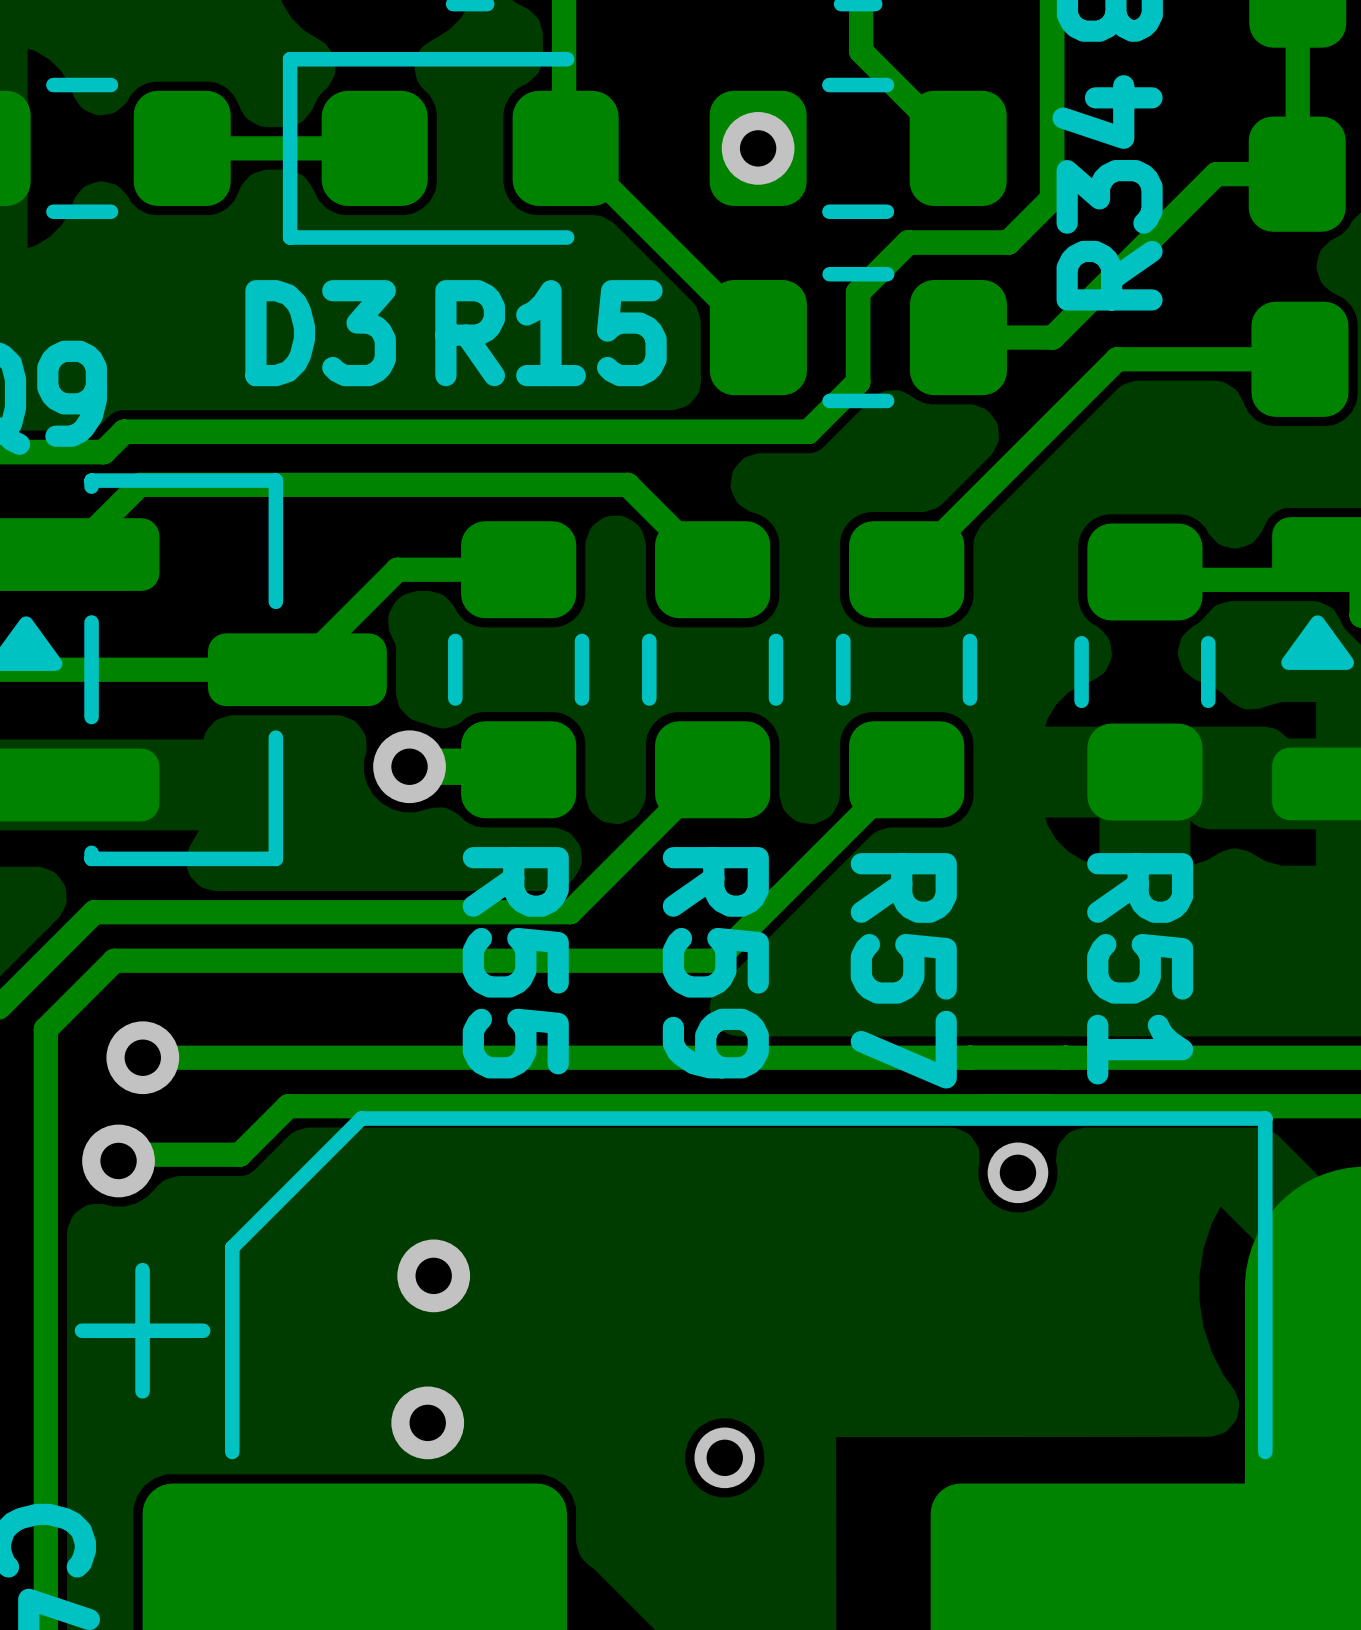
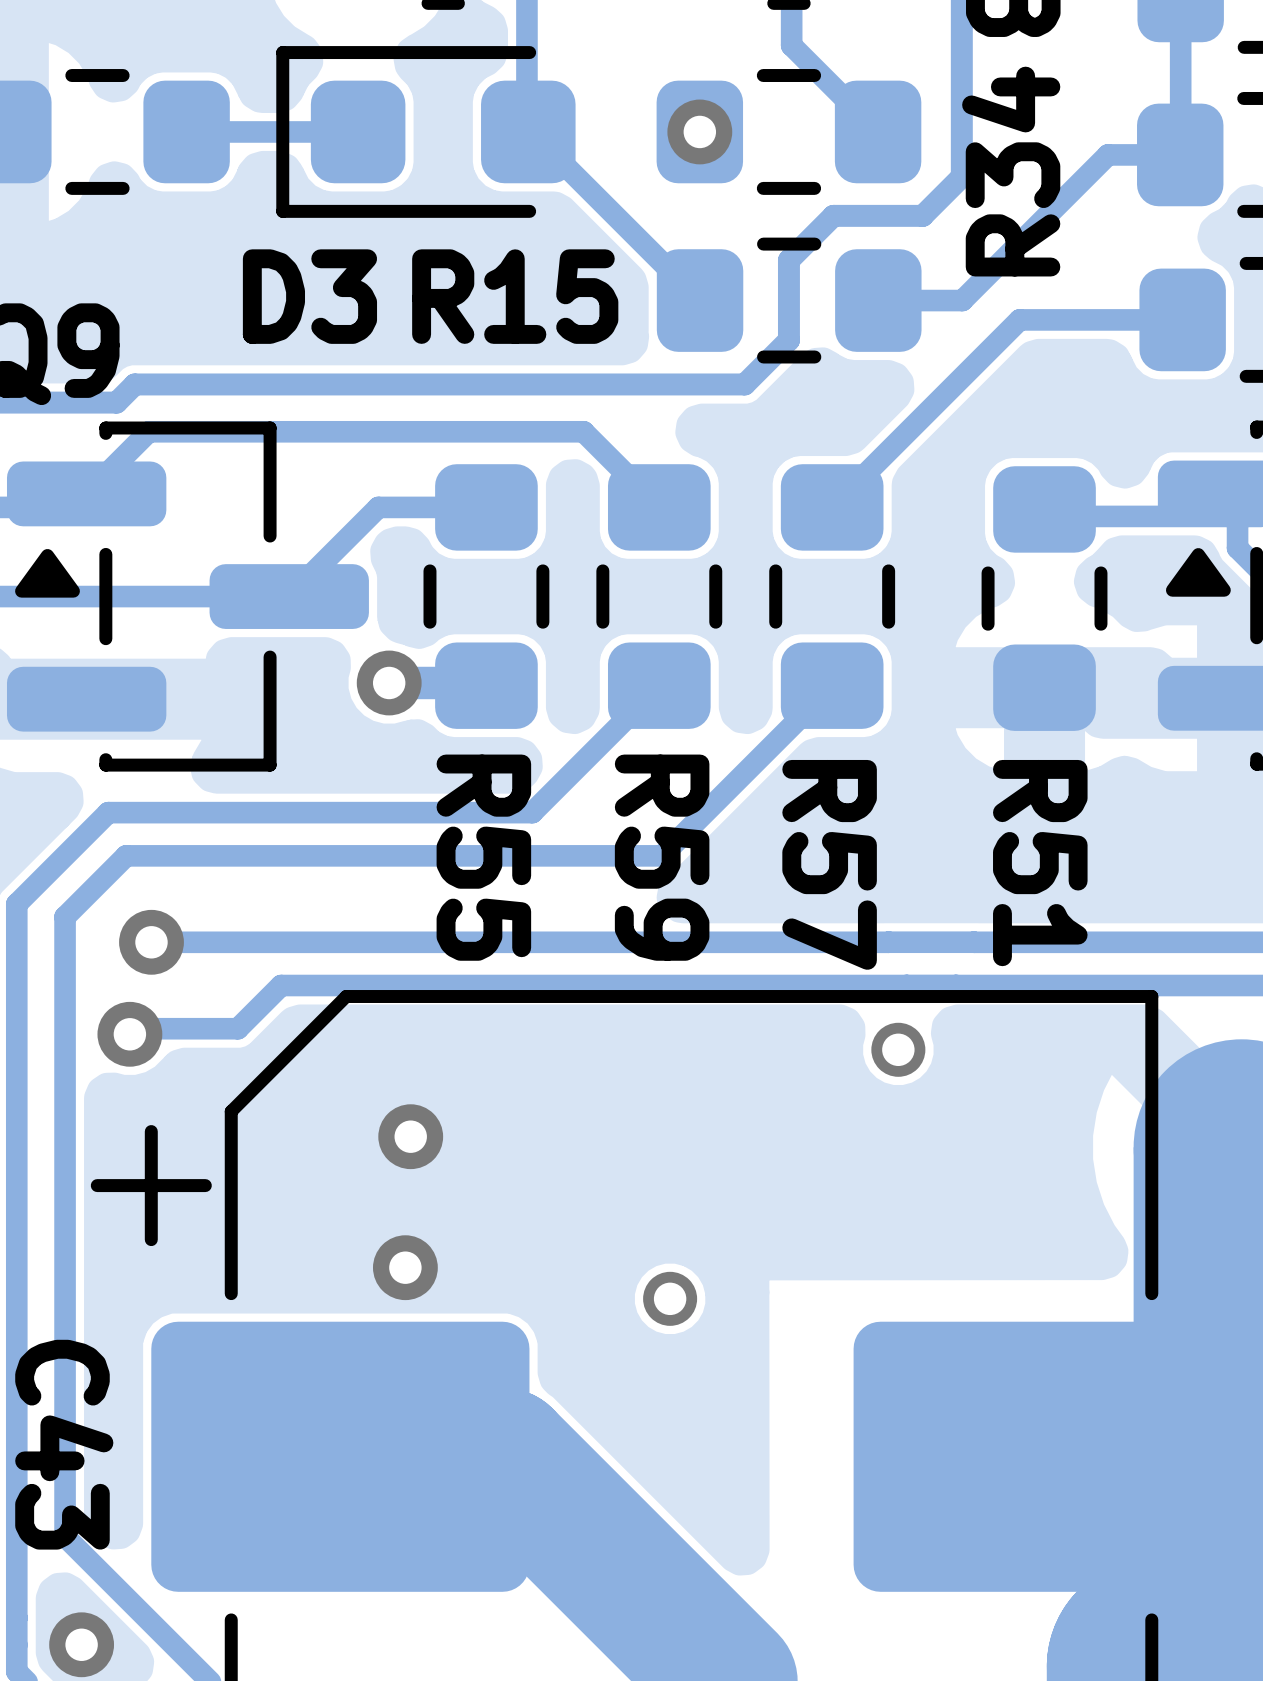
via position: (1017, 1172) -> (898, 1049)

